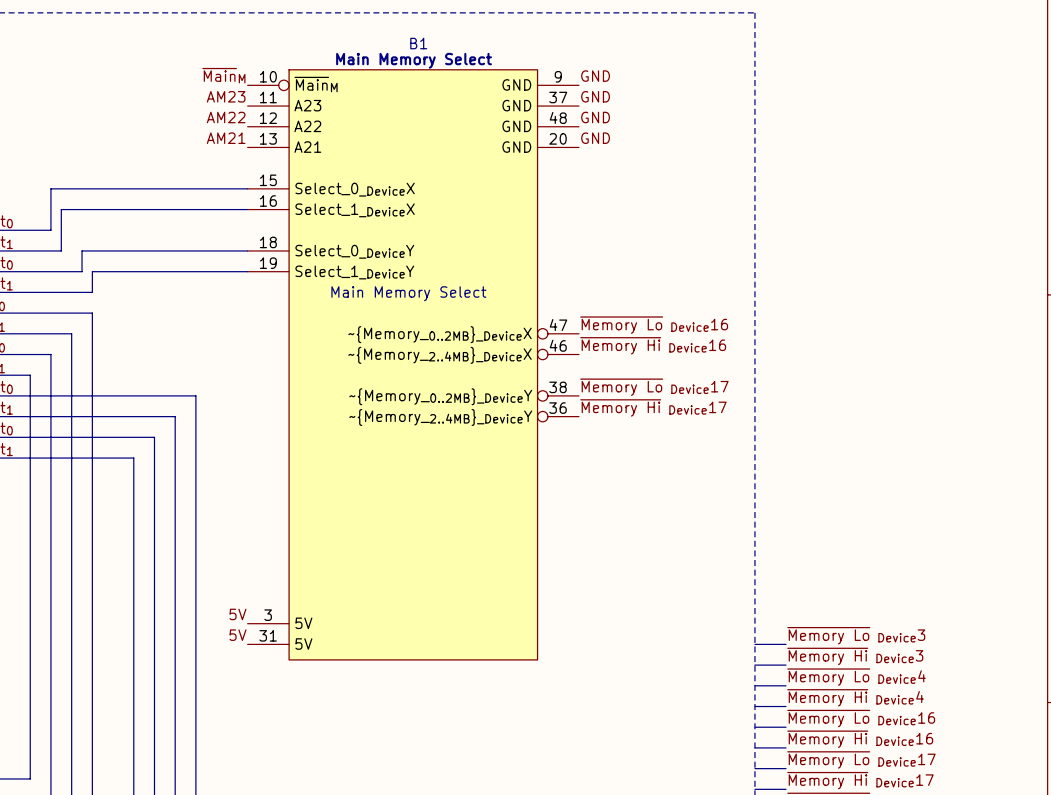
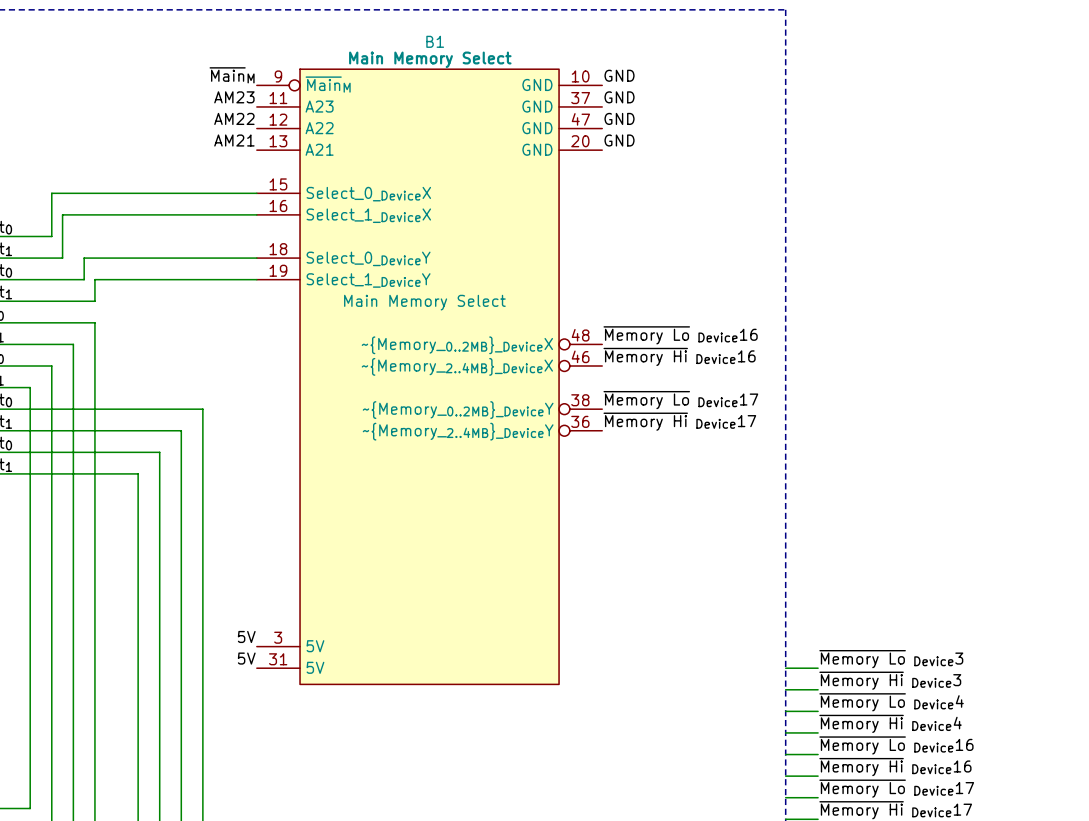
B1 pin number: 10 (268, 76) -> 9 (278, 76)
B1 pin number: 9 (558, 76) -> 10 (580, 76)
B1 pin number: 48 (558, 117) -> 47 (580, 119)
B1 pin number: 47 (558, 325) -> 48 (580, 335)

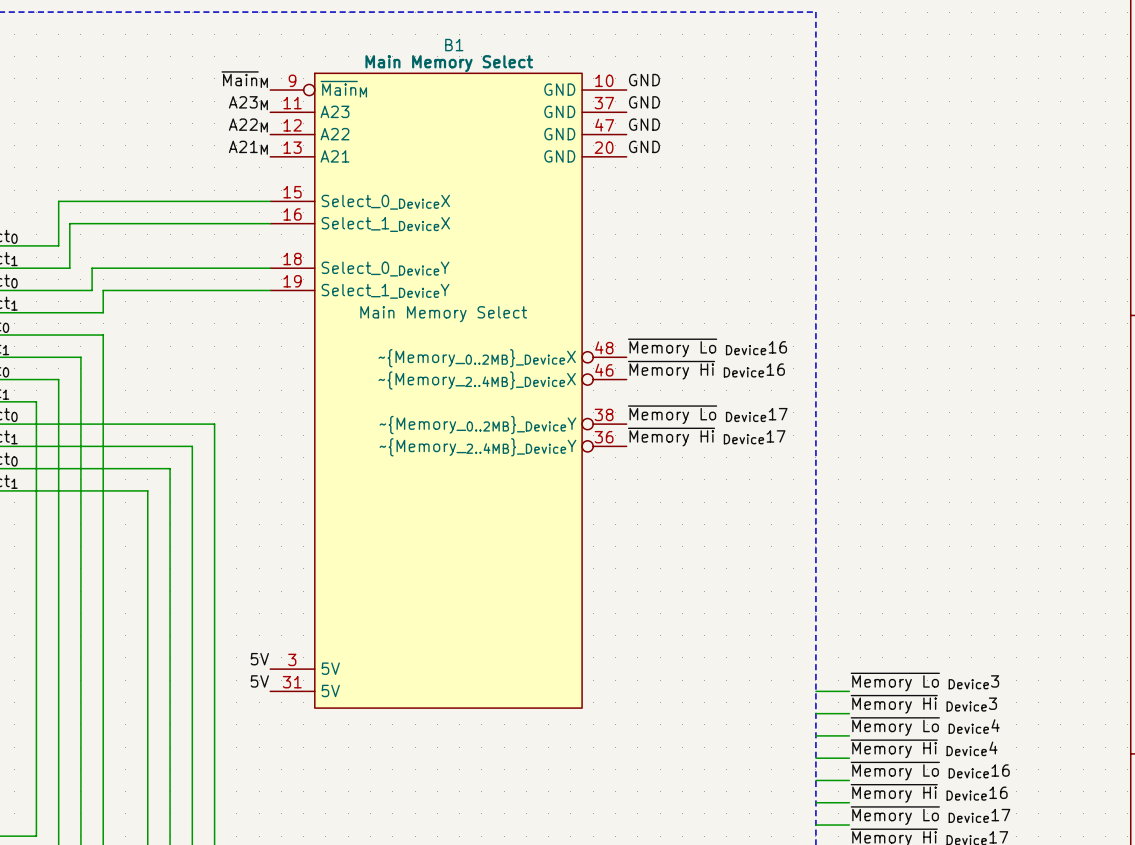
label: AM23 (234, 97) -> A23M (248, 103)
label: AM22 (234, 118) -> A22M (248, 125)
label: AM21 (234, 140) -> A21M (248, 147)

